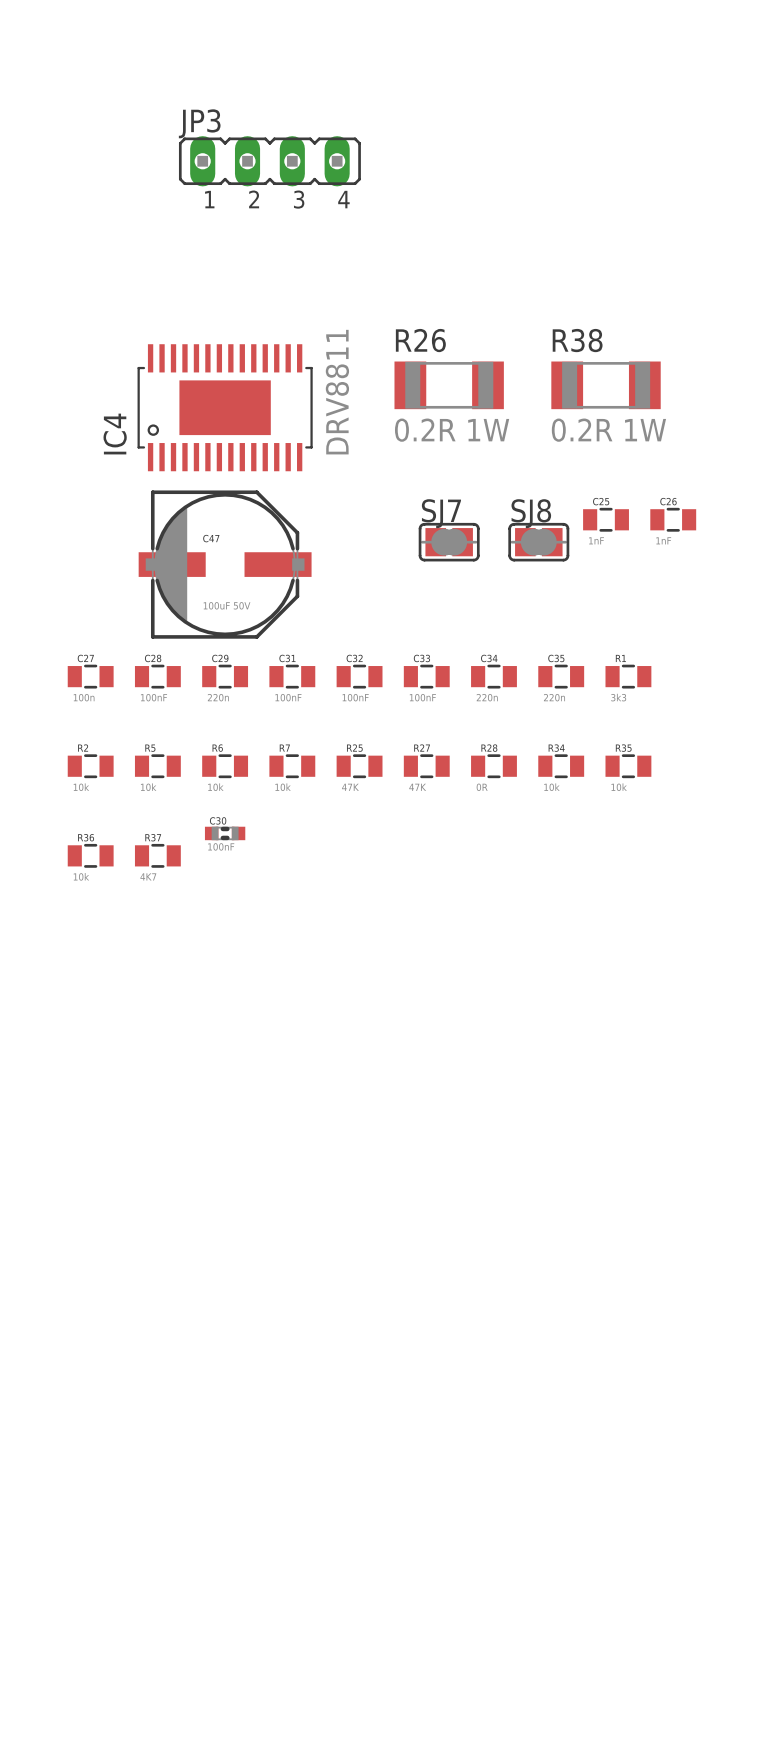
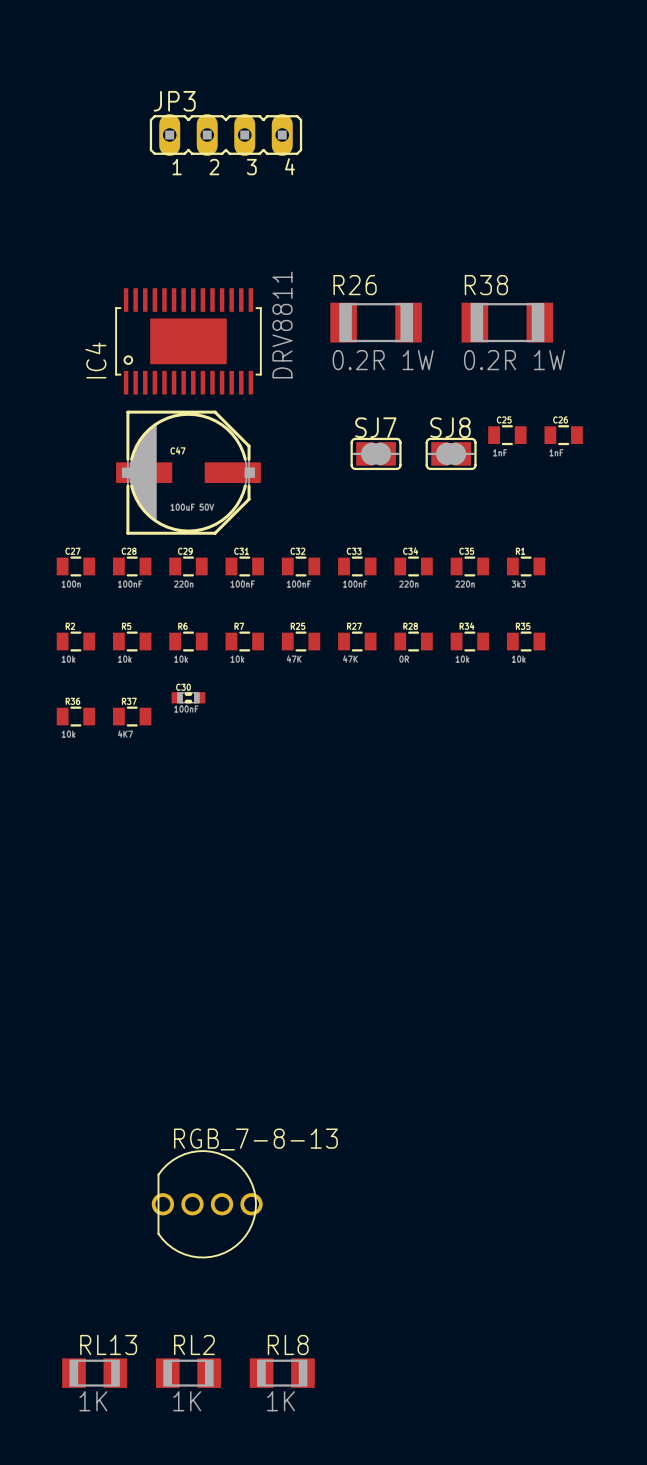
RGB_7-8-13: none -> (207, 1204)
RL13: none -> 1K (94, 1373)
RL2: none -> 1K (188, 1373)
RL8: none -> 1K (282, 1373)

